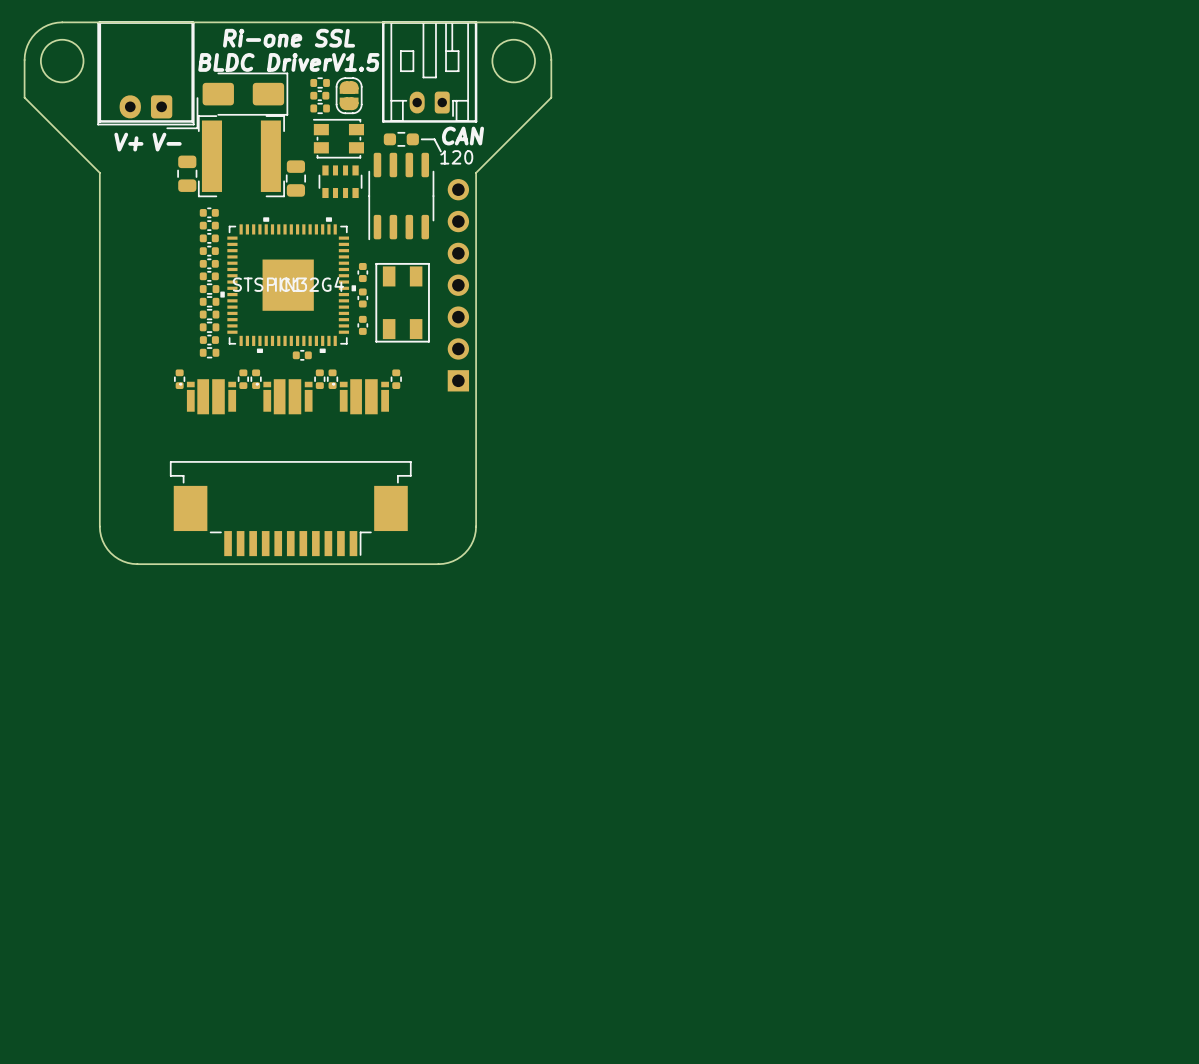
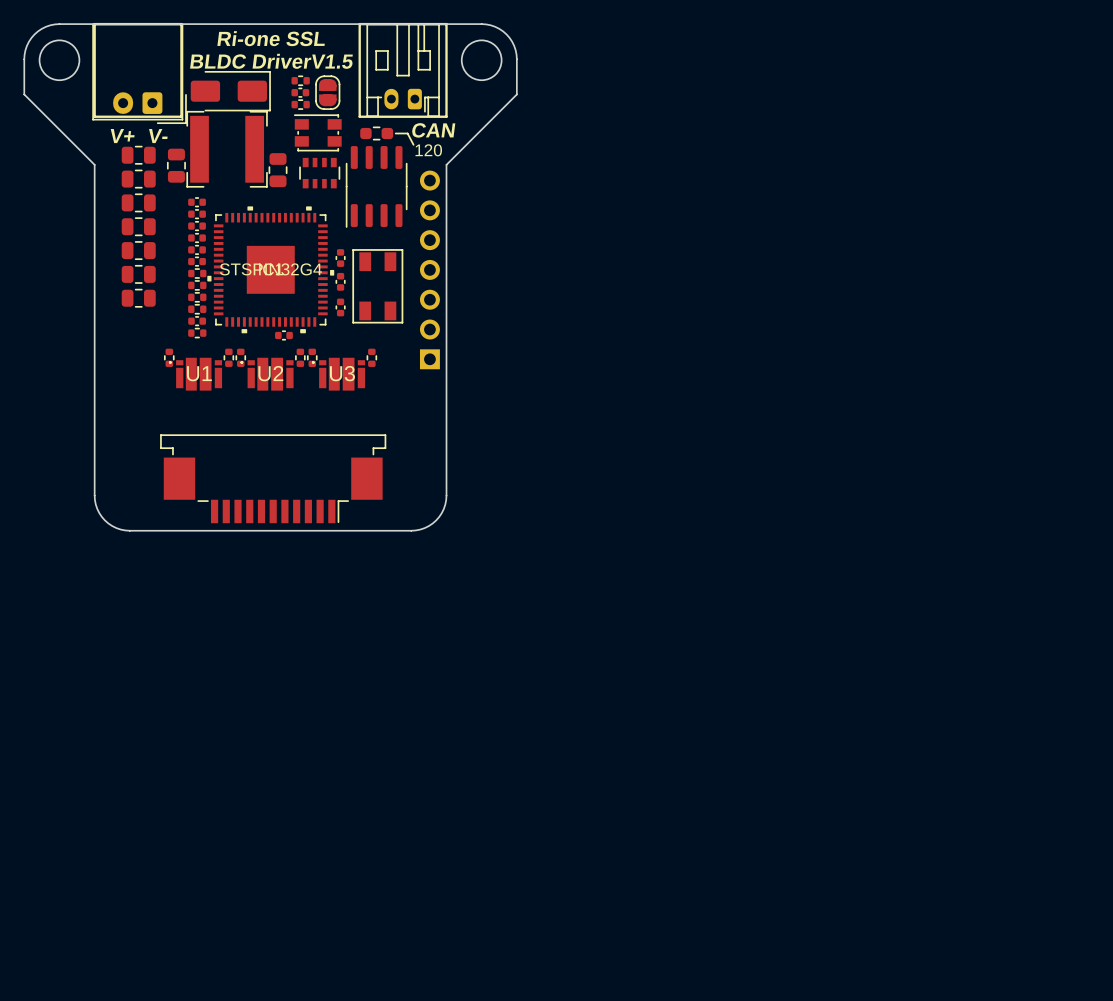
part: none -> (138, 155)
part: none -> (138, 179)
part: none -> (138, 202)
part: none -> (138, 226)
part: none -> (138, 250)
part: none -> (138, 274)
part: none -> (138, 298)
U1 name: none -> U1 (199, 373)
U2 name: none -> U2 (270, 373)
U3 name: none -> U3 (342, 373)

